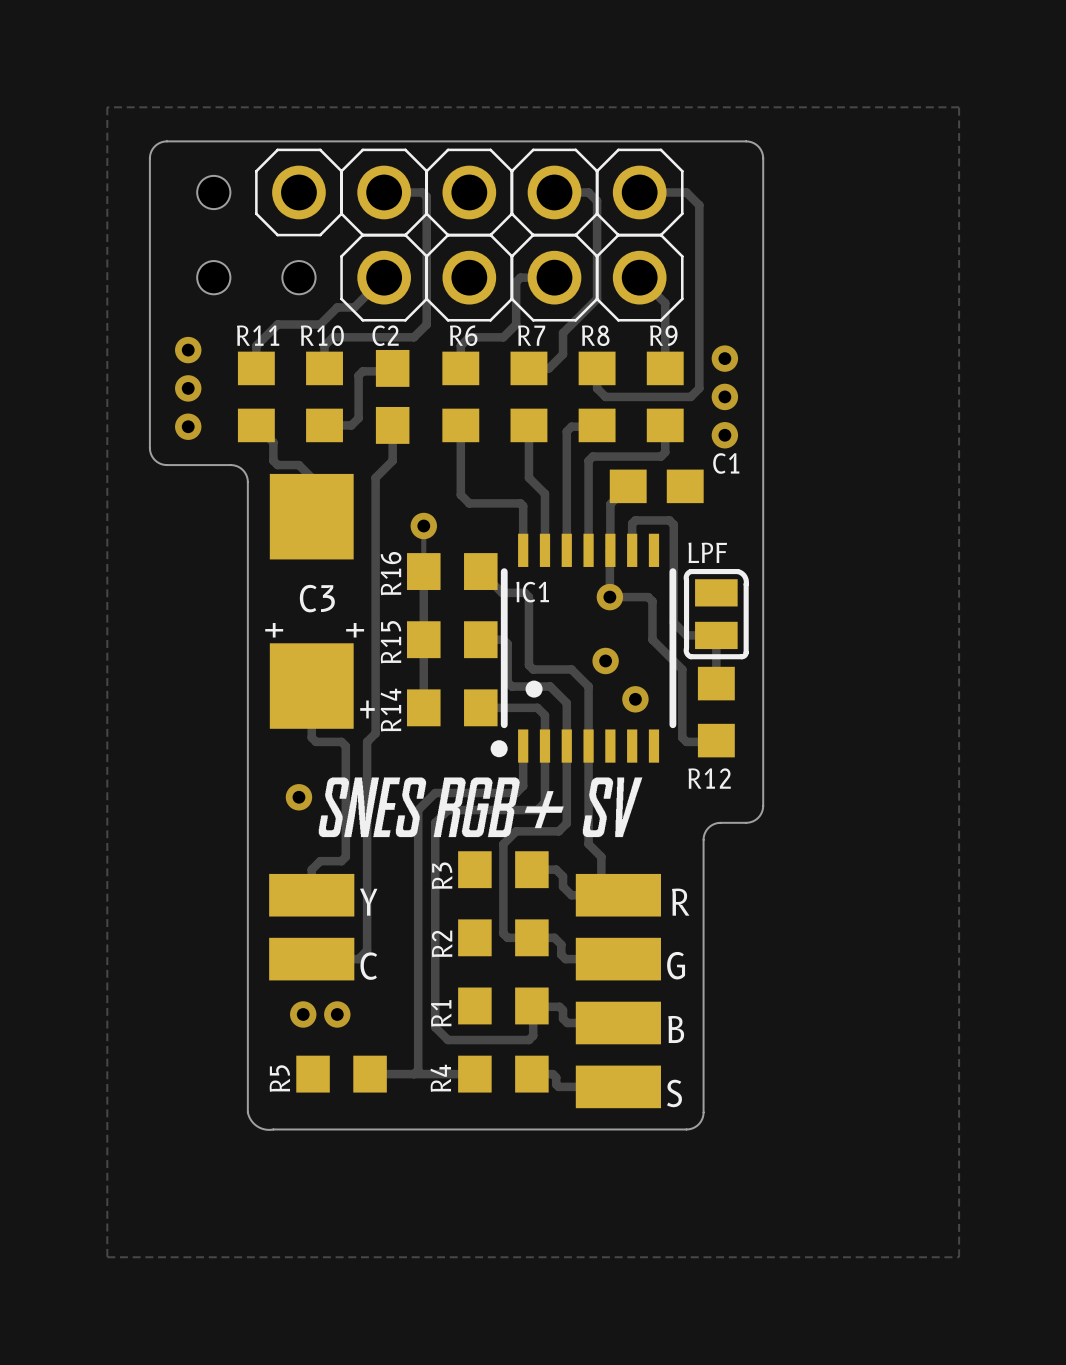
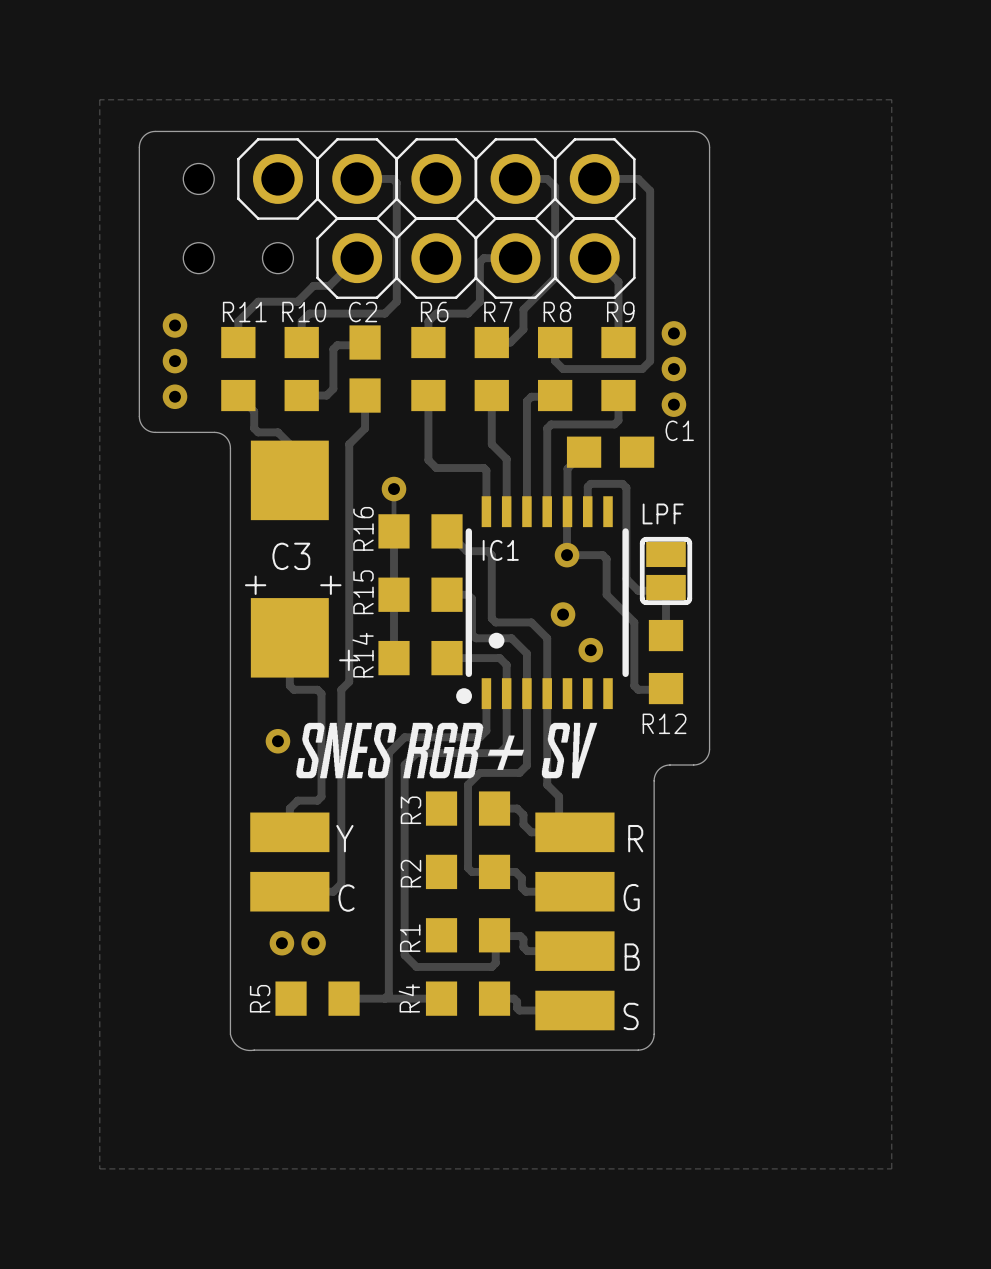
LPF footprint: [683, 568, 749, 660] -> [639, 536, 693, 606]

